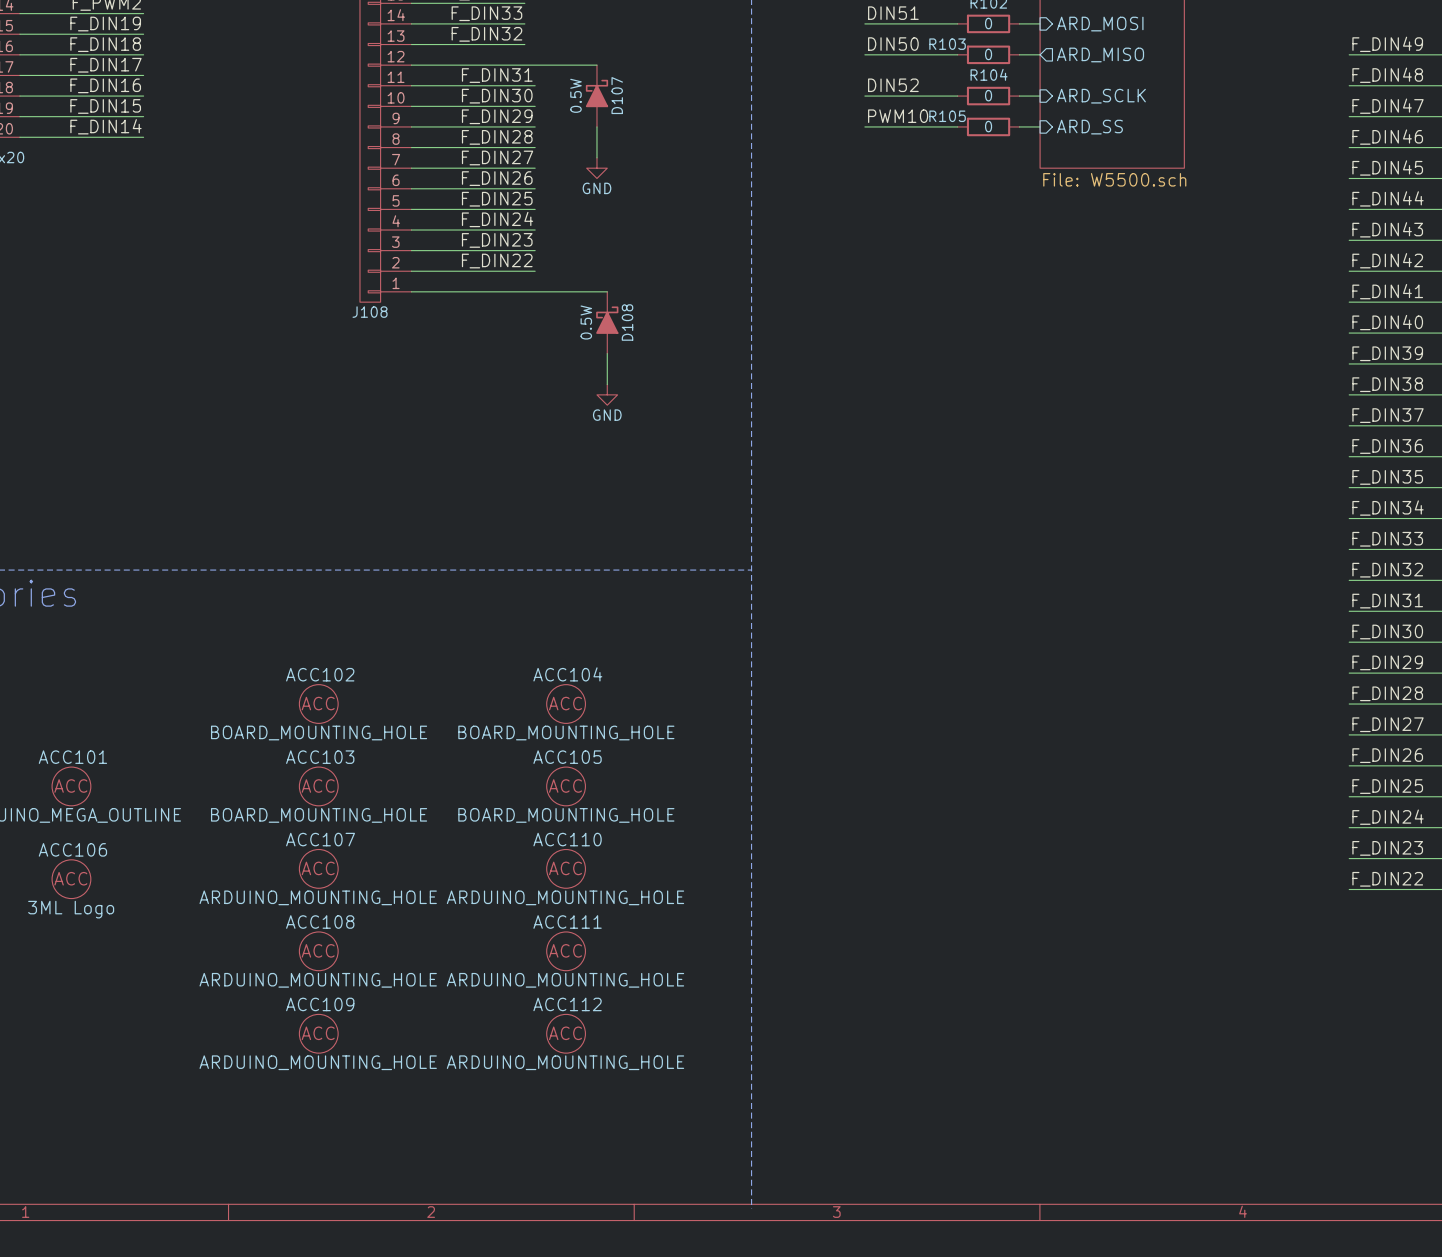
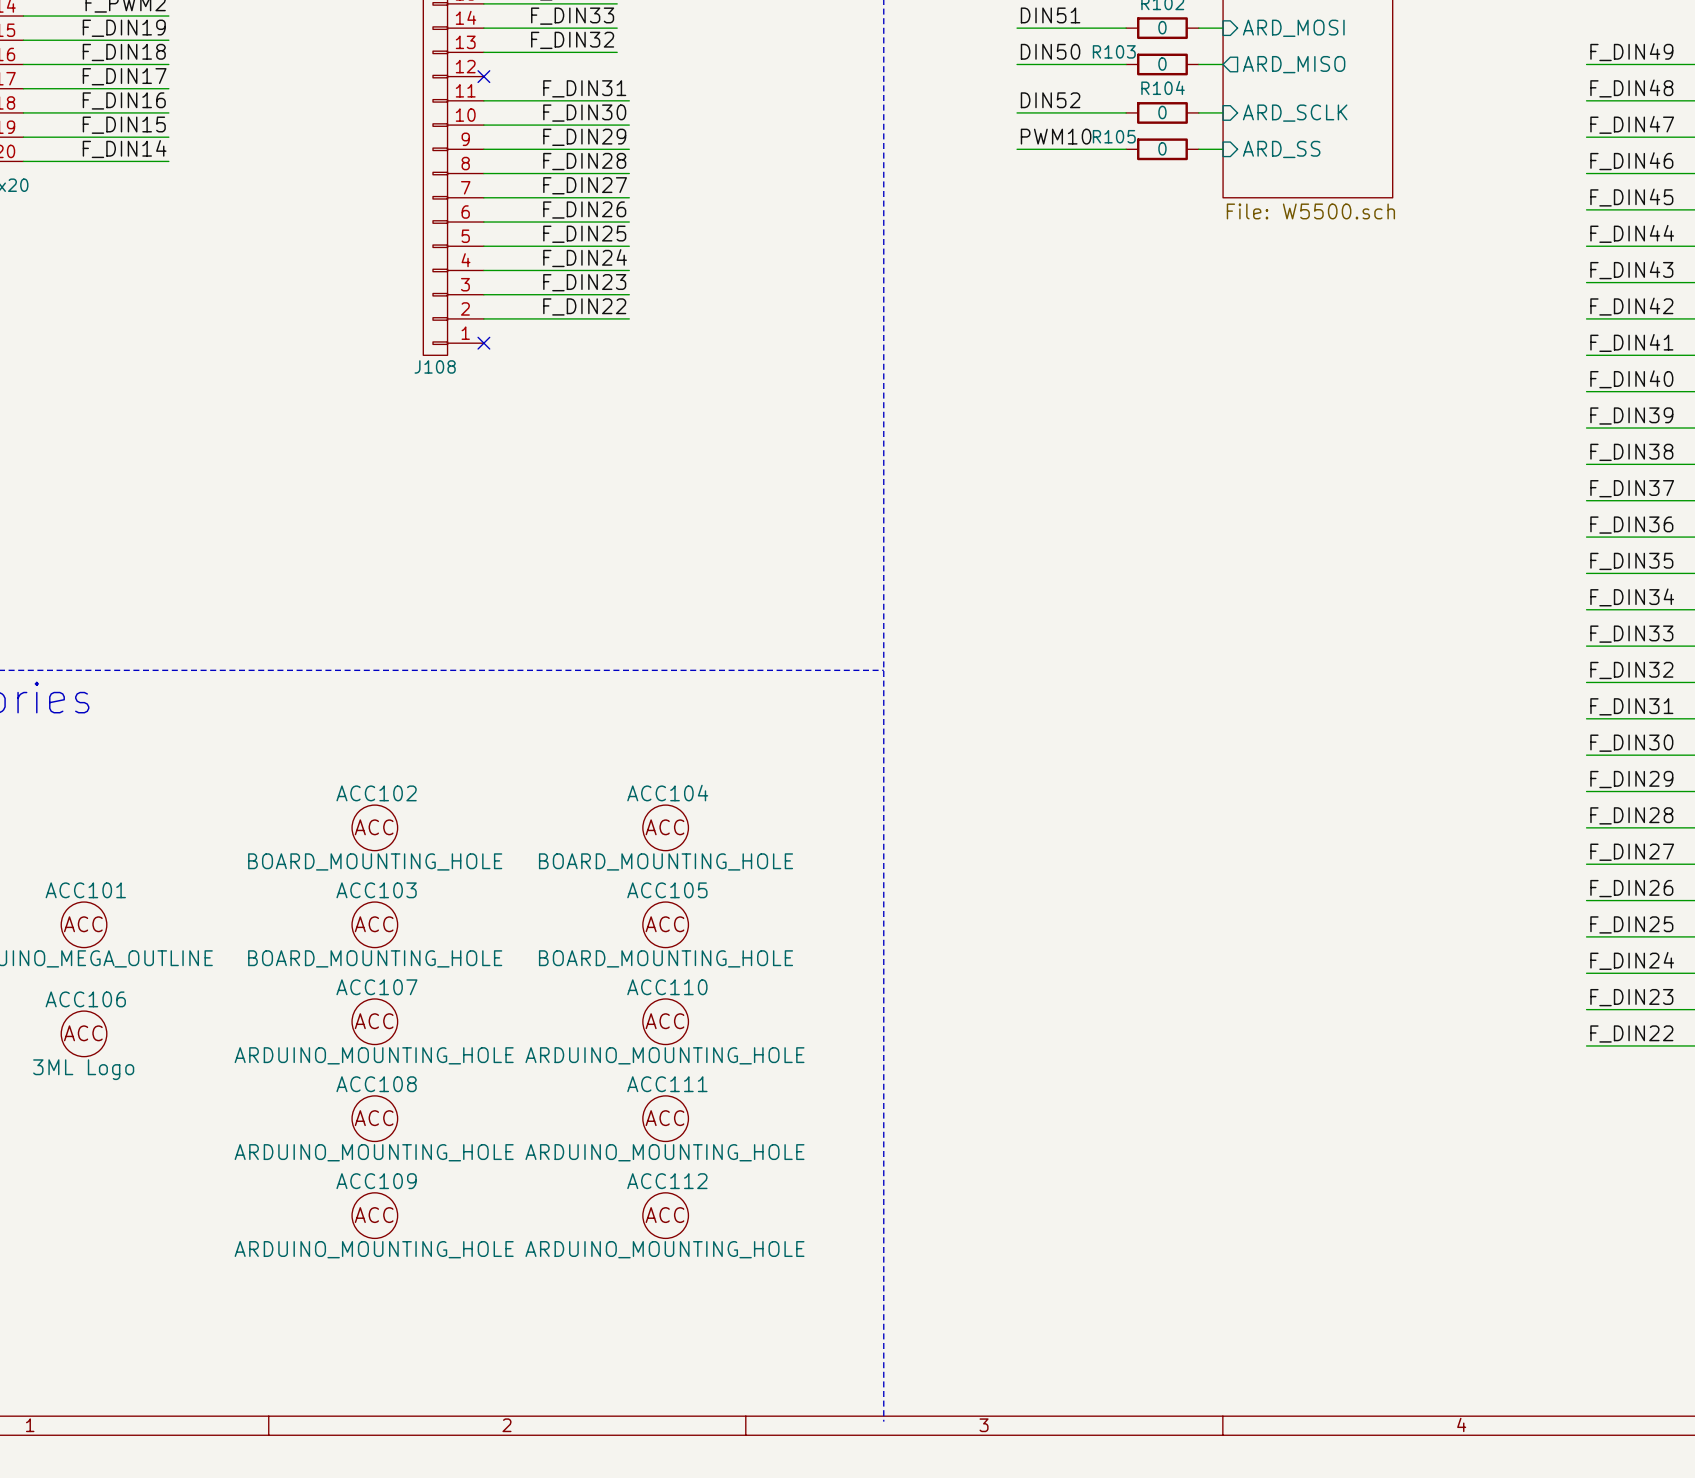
wire: (411, 65) (596, 65) -> none
no-connect mark: none -> (483, 76)
D107: 0.5W (596, 96) -> none
wire: (596, 126) (596, 157) -> none
power symbol: GND (596, 168) -> none
wire: (411, 291) (607, 291) -> none
no-connect mark: none -> (483, 343)
D108: 0.5W (607, 322) -> none
wire: (607, 353) (607, 384) -> none
power symbol: GND (607, 394) -> none

